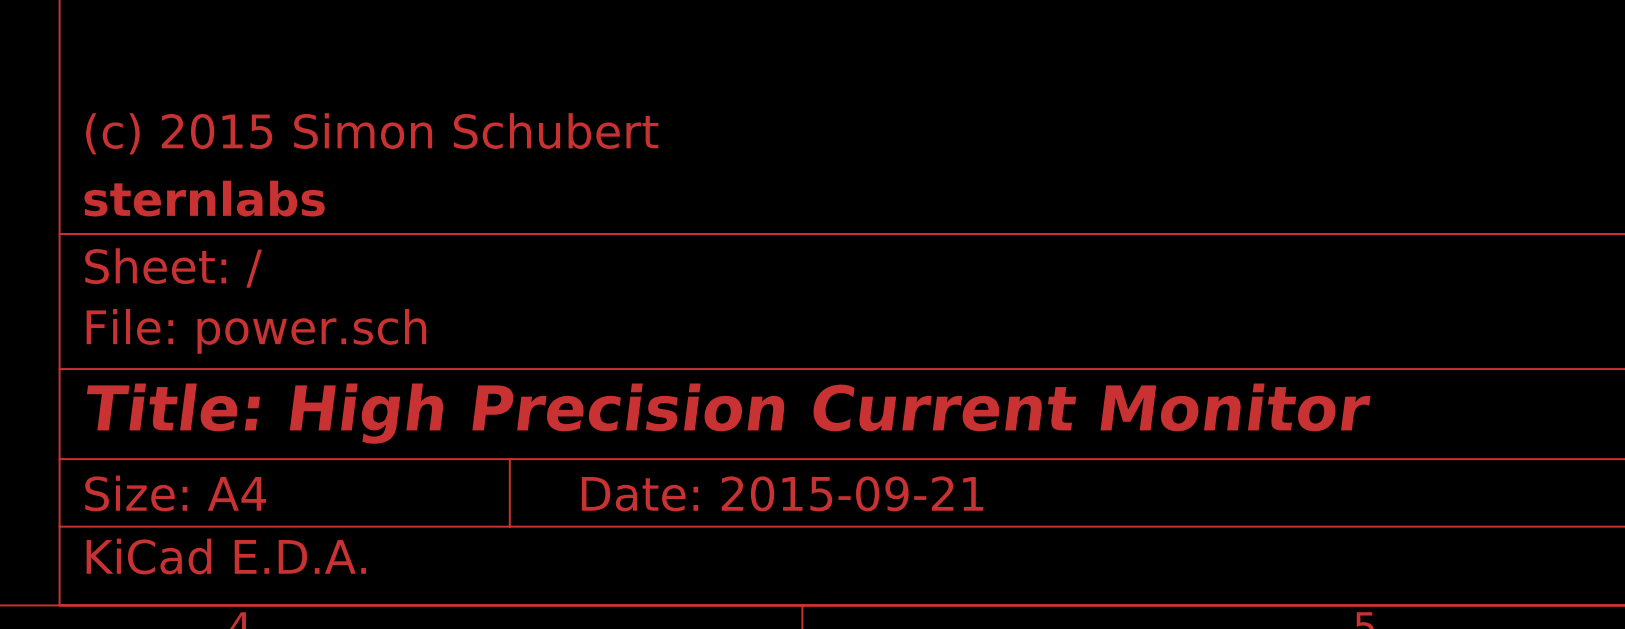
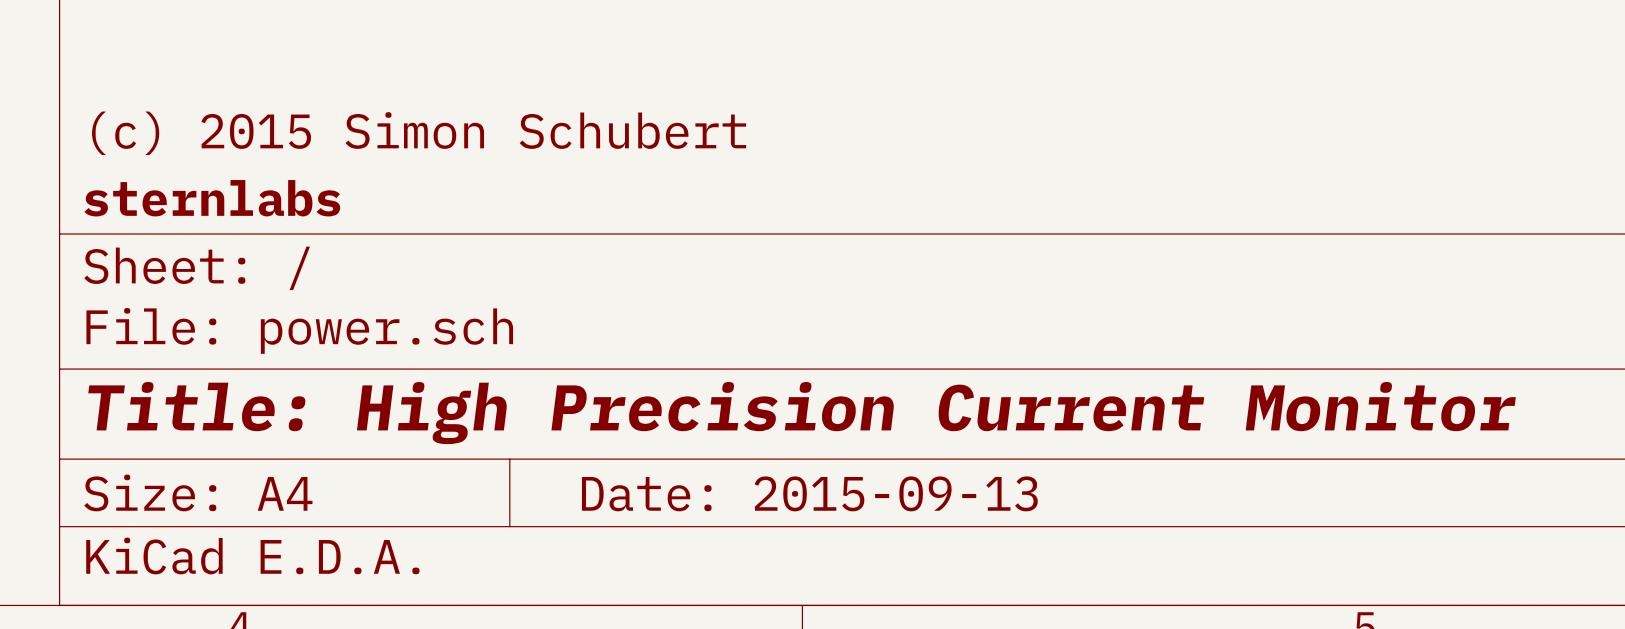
title block: Date: 2015-09-21 (782, 493) -> Date: 2015-09-13 (809, 493)

